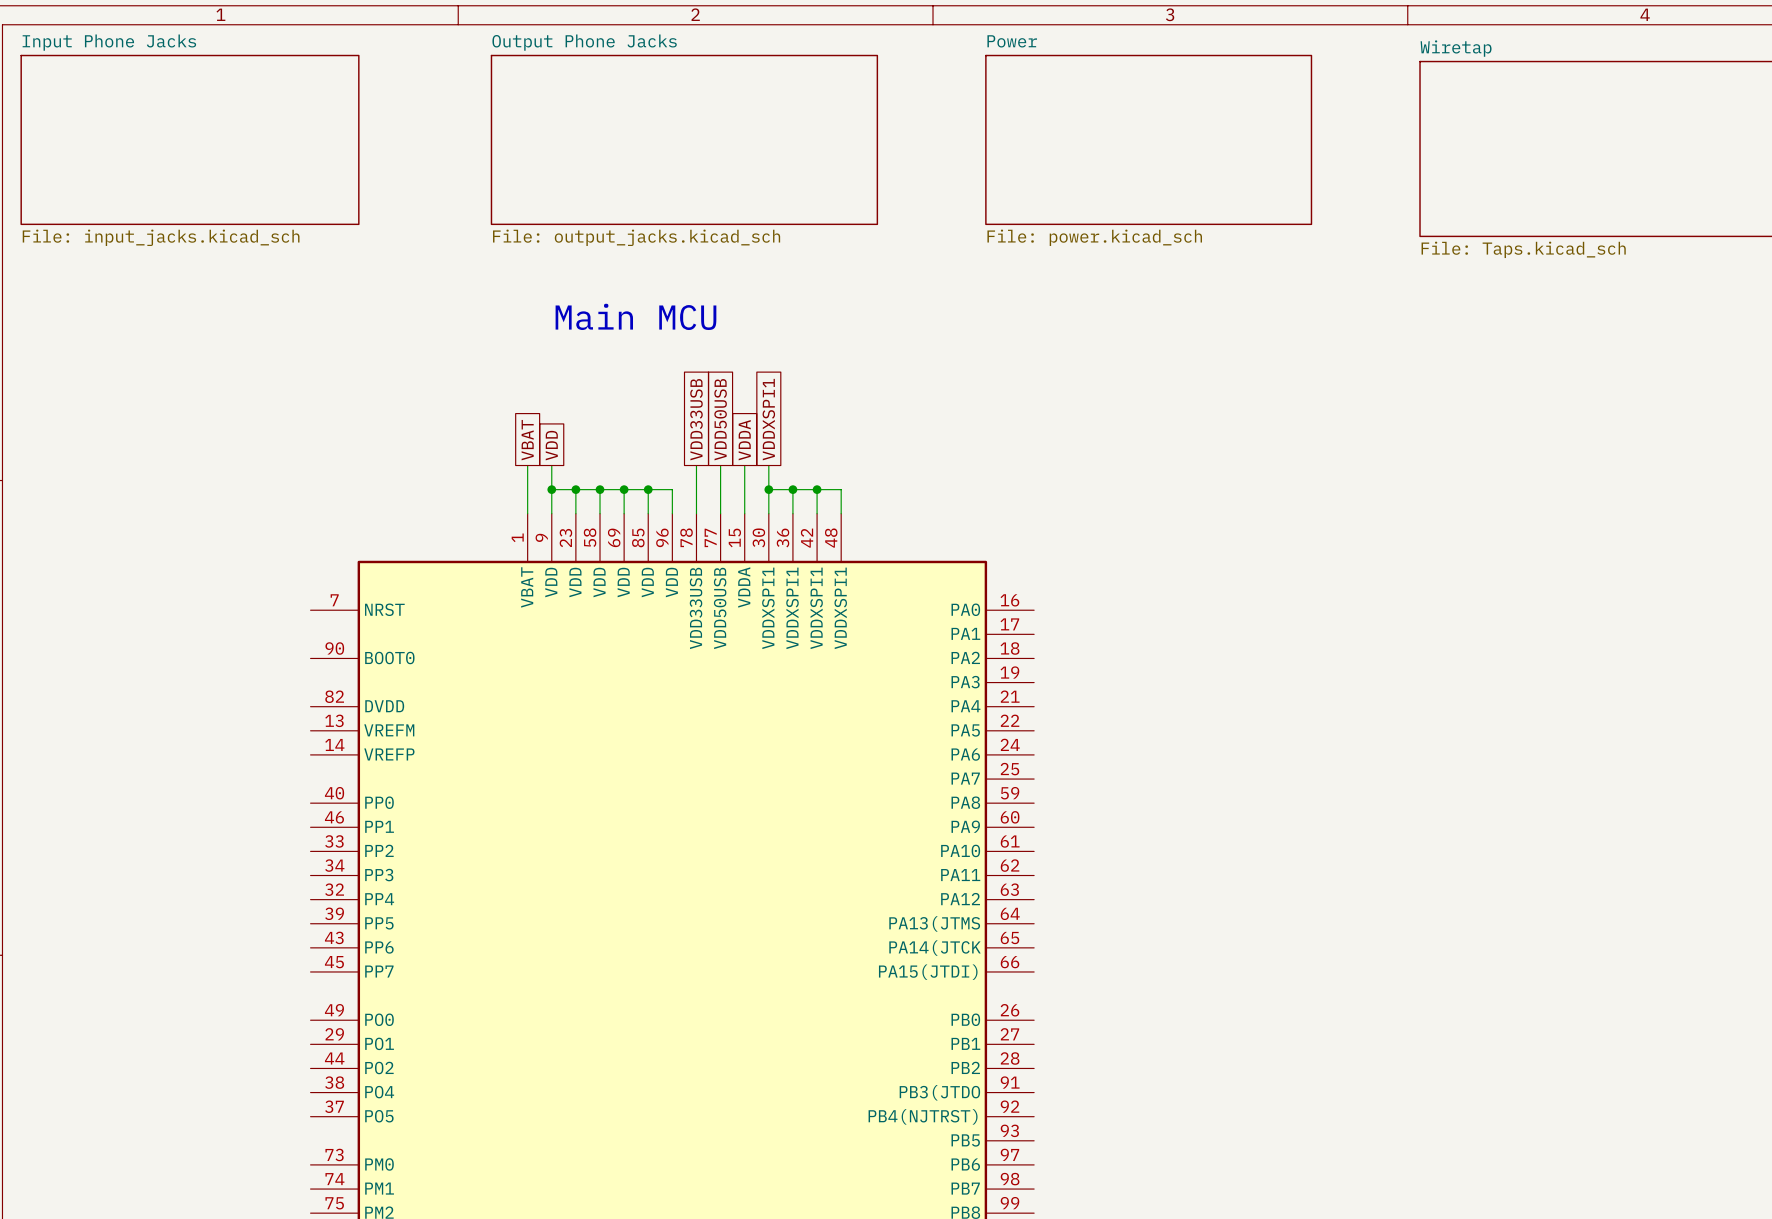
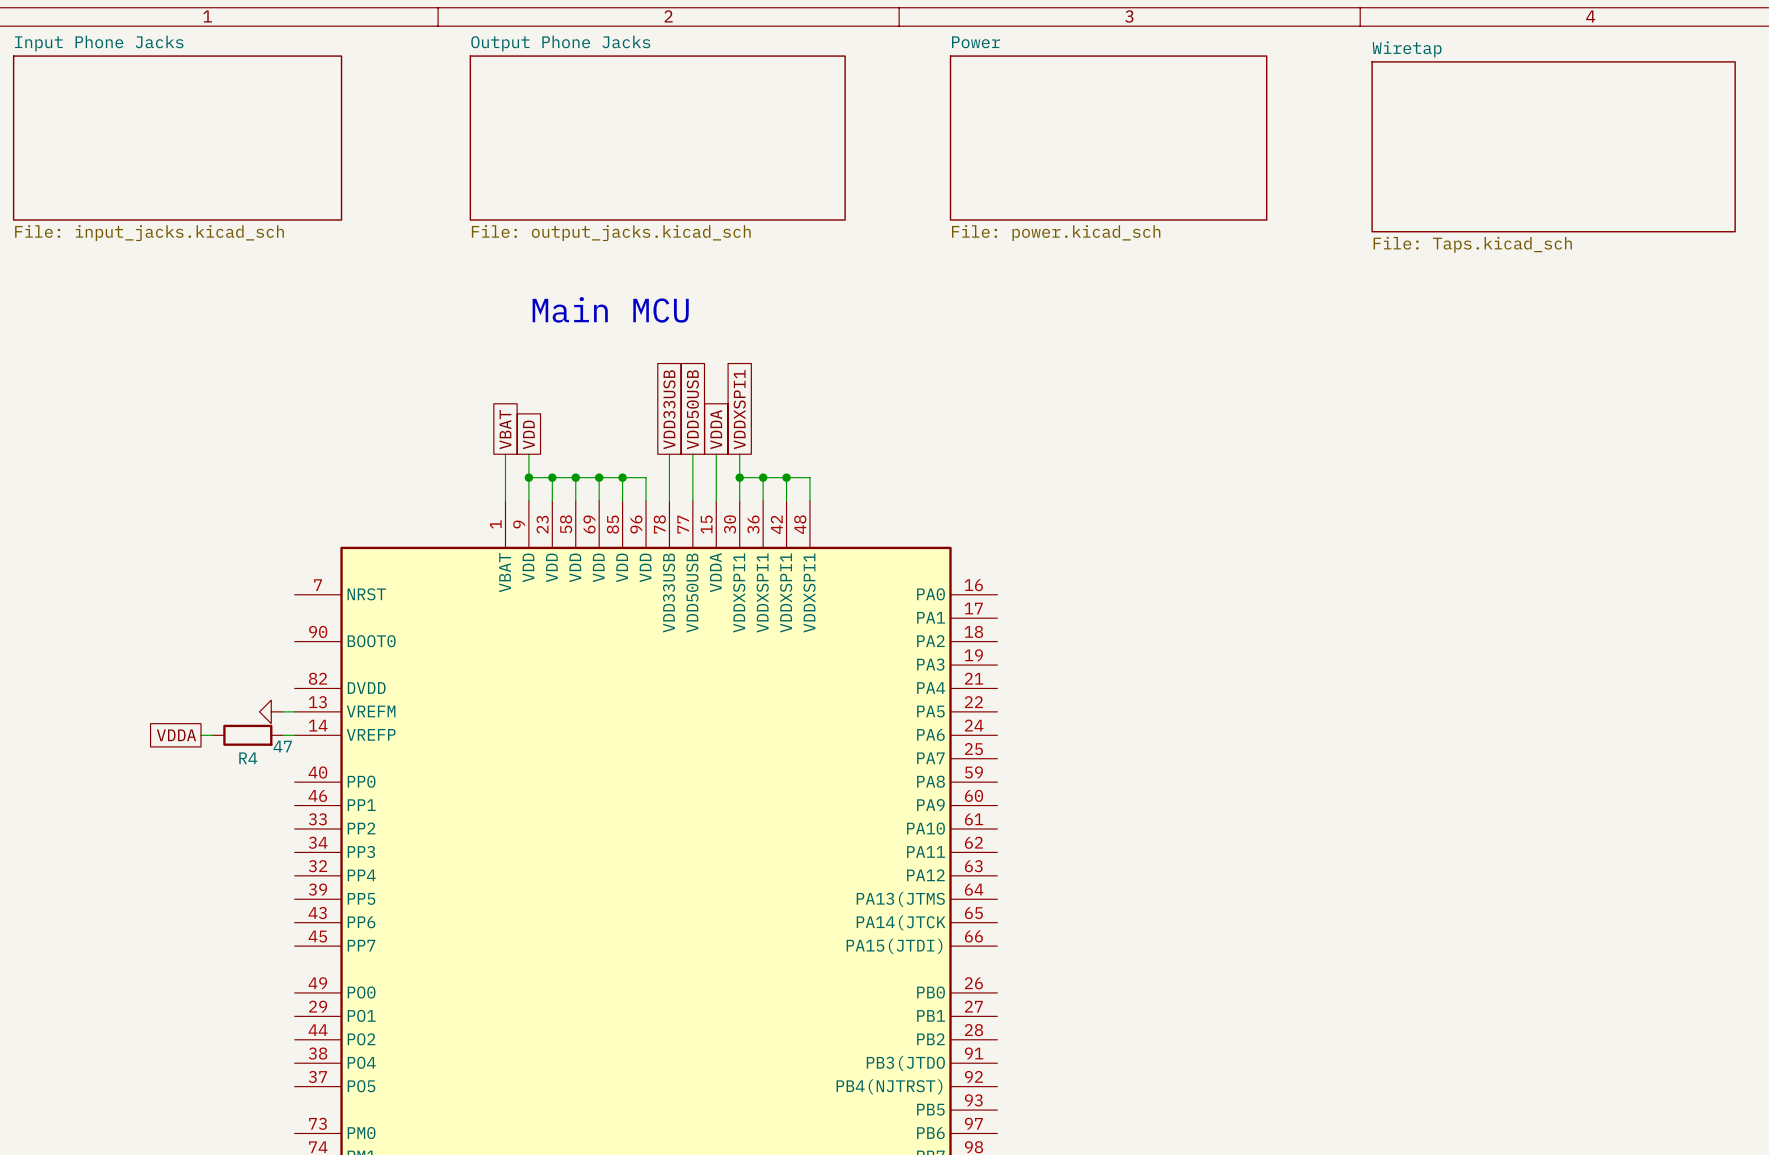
power symbol: none -> (271, 711)
wire: none -> (282, 711) (294, 711)
global label: none -> VDDA (176, 735)
wire: none -> (200, 735) (212, 735)
R4: none -> 47 (247, 735)
wire: none -> (282, 735) (294, 735)

